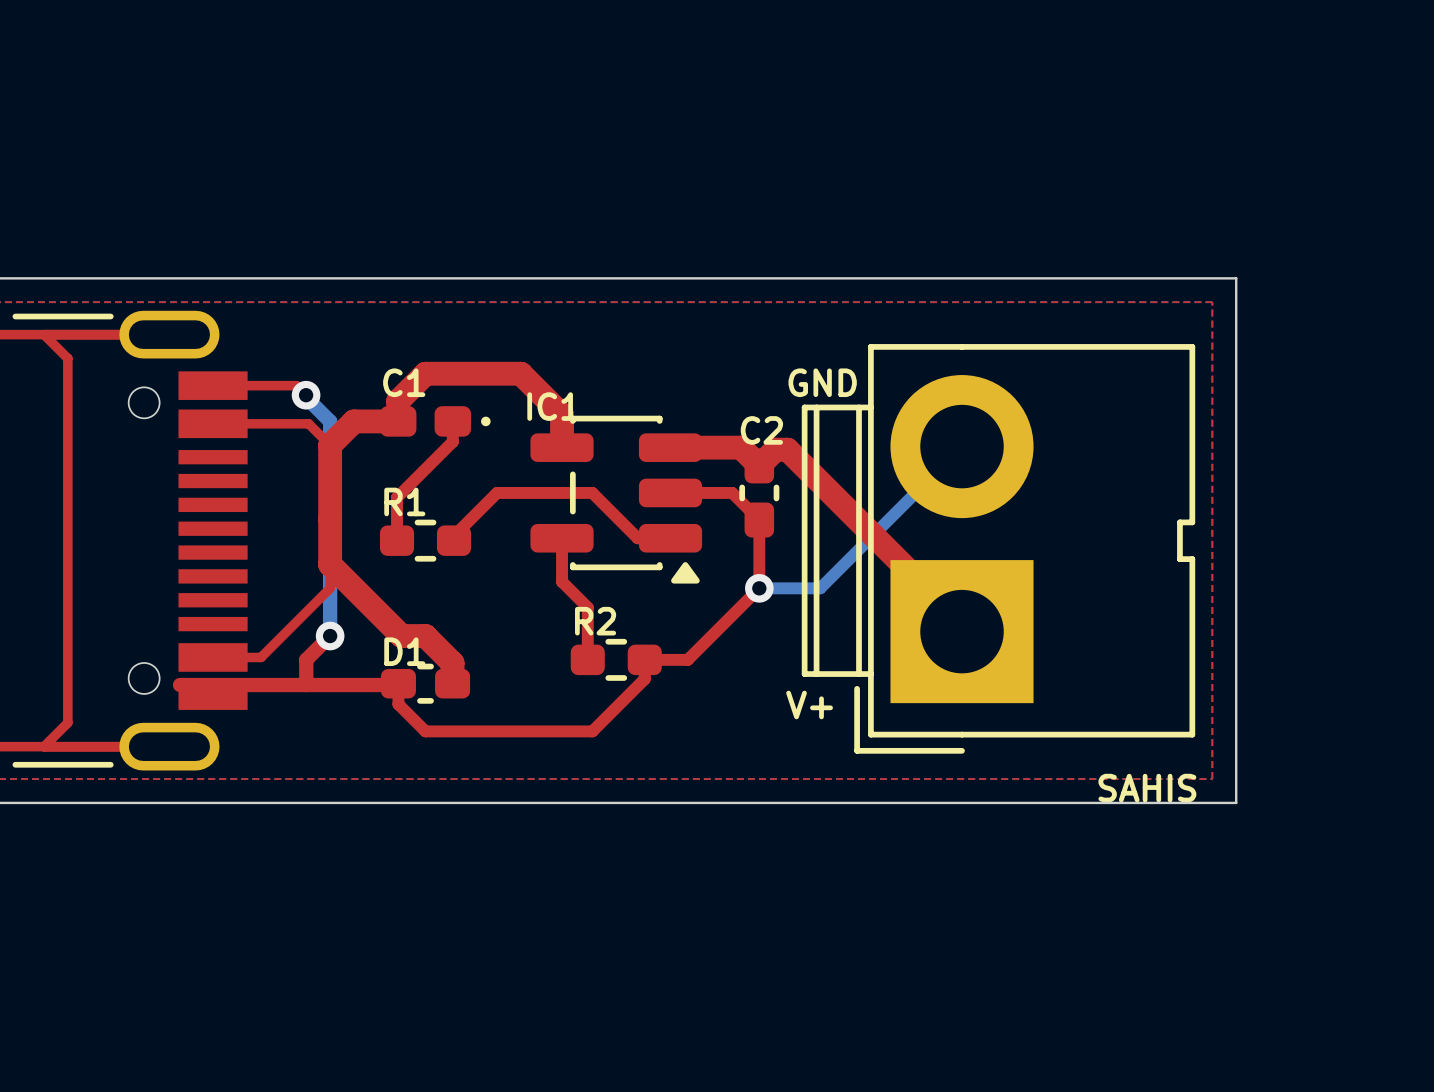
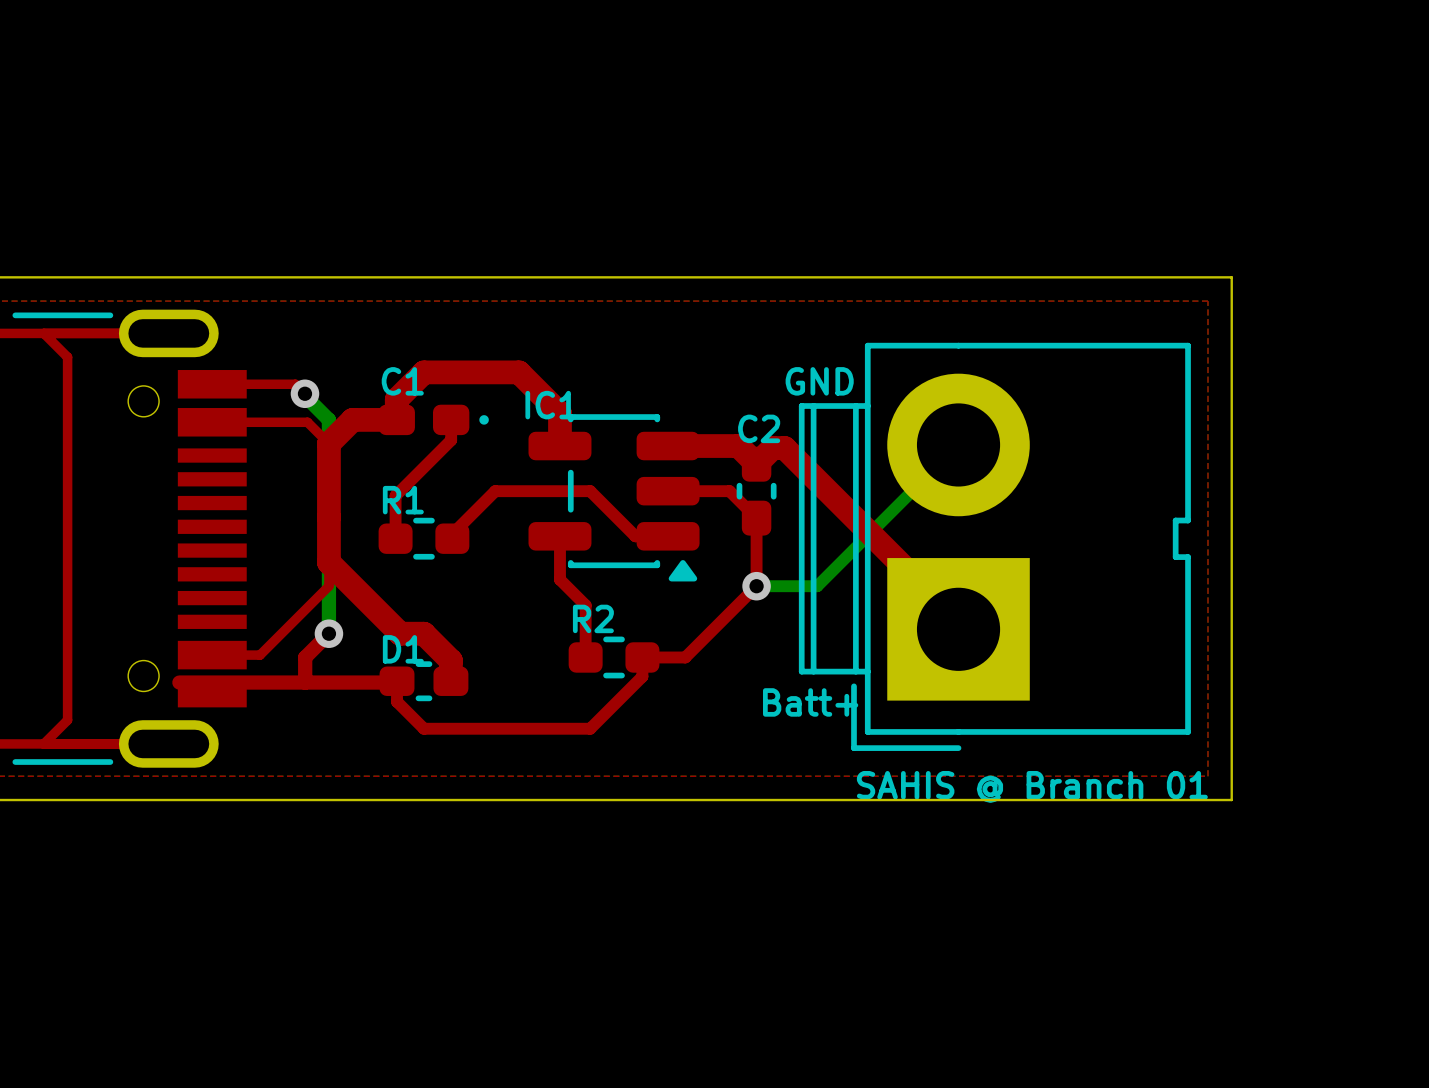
text: V+ (809, 704) -> Batt+ (810, 702)
text: SAHIS (1147, 788) -> none
text: none -> SAHIS @ Branch 01 (1032, 786)

